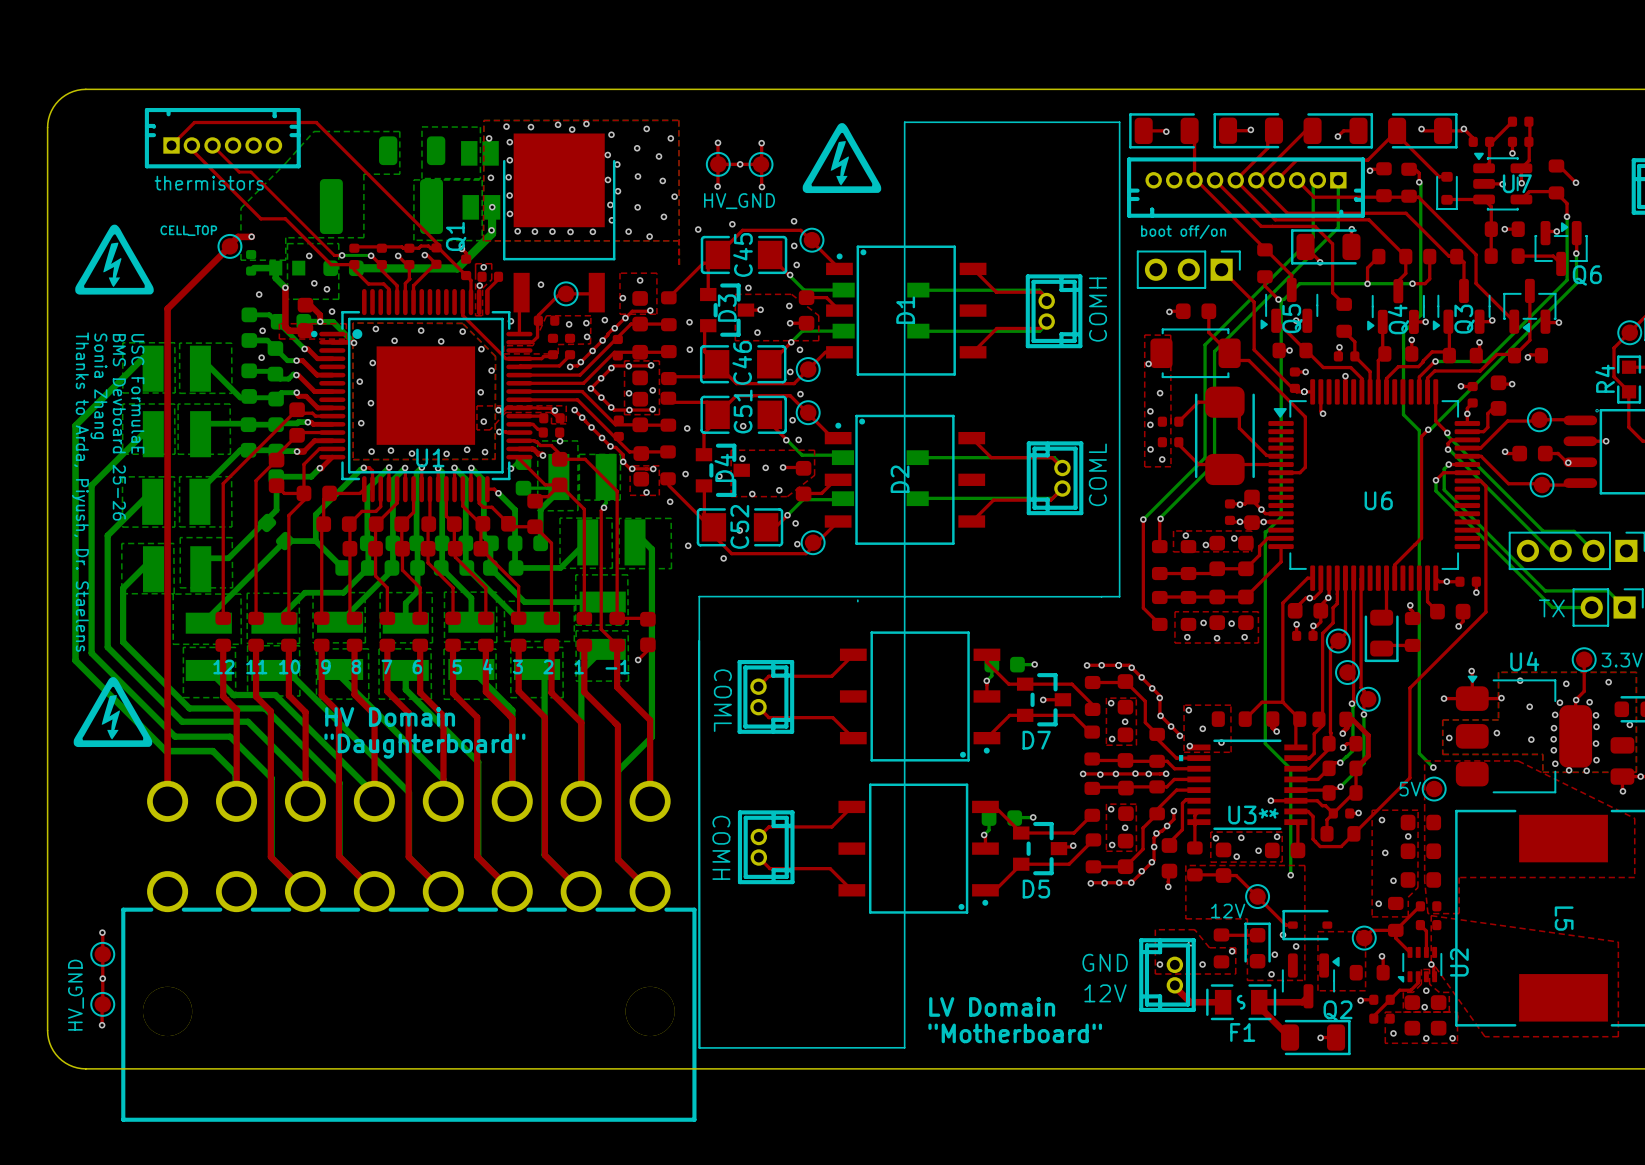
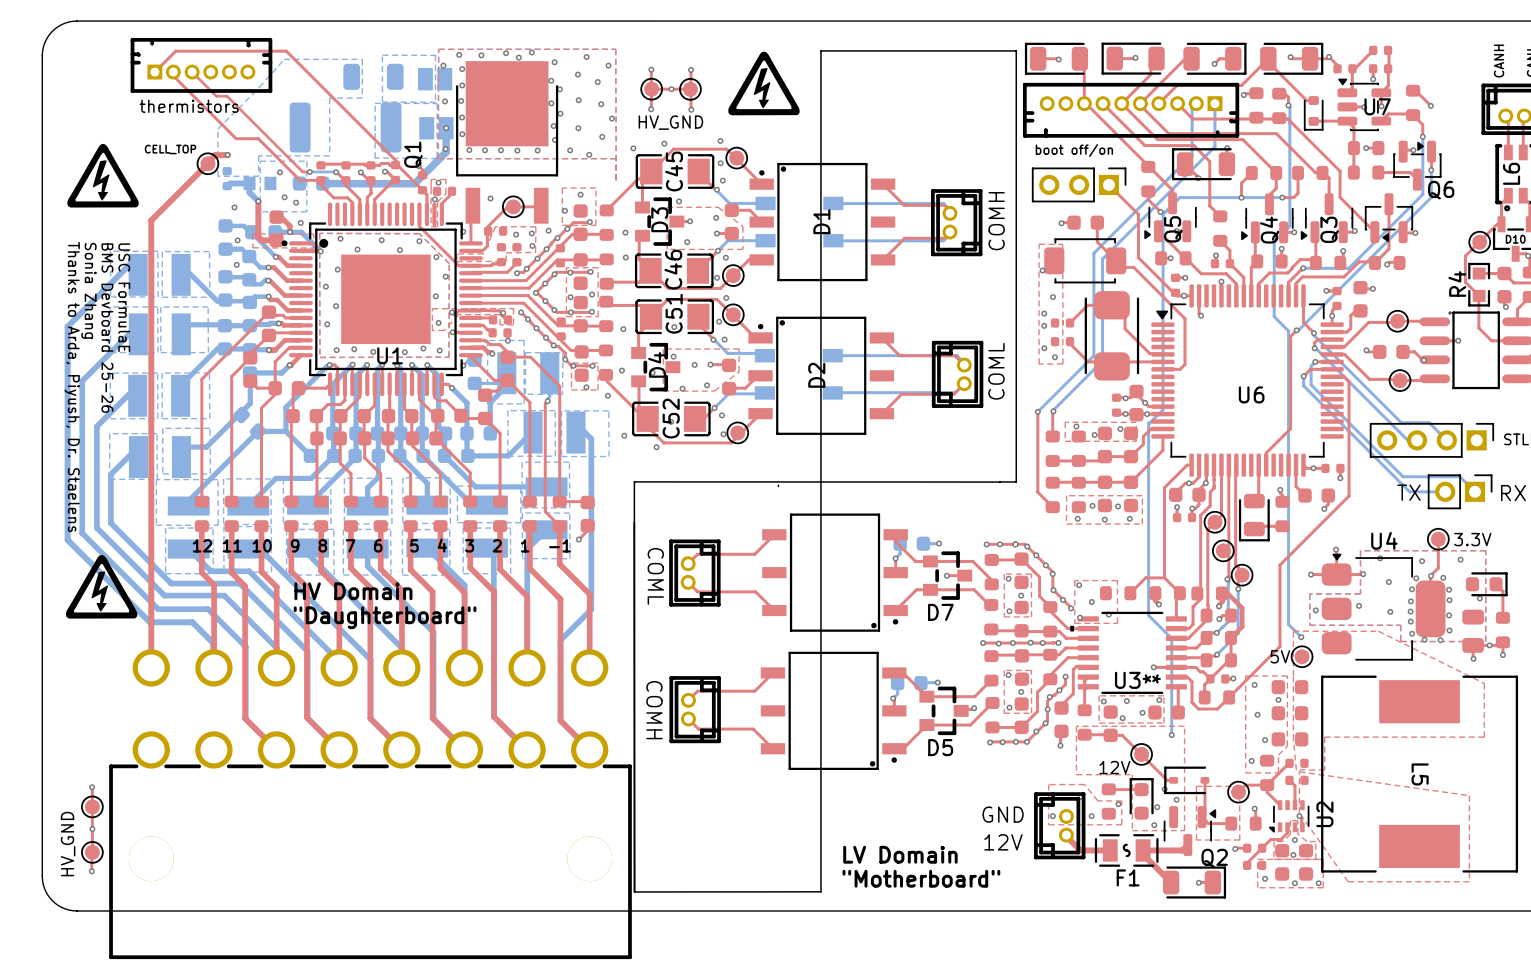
top track: none -> (1204, 780) (1204, 814) (1201, 817) (1208, 823) (1231, 823)

